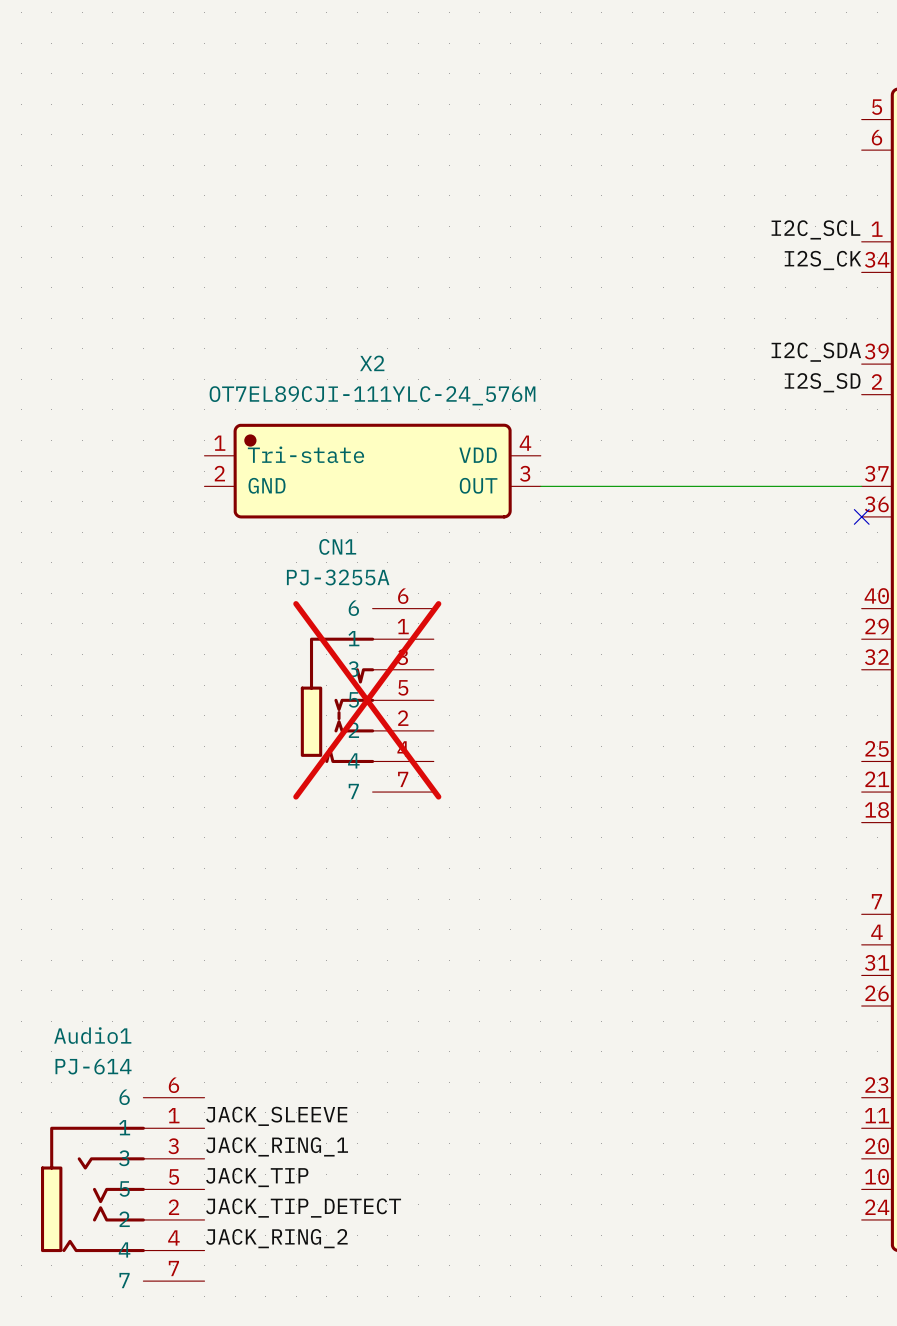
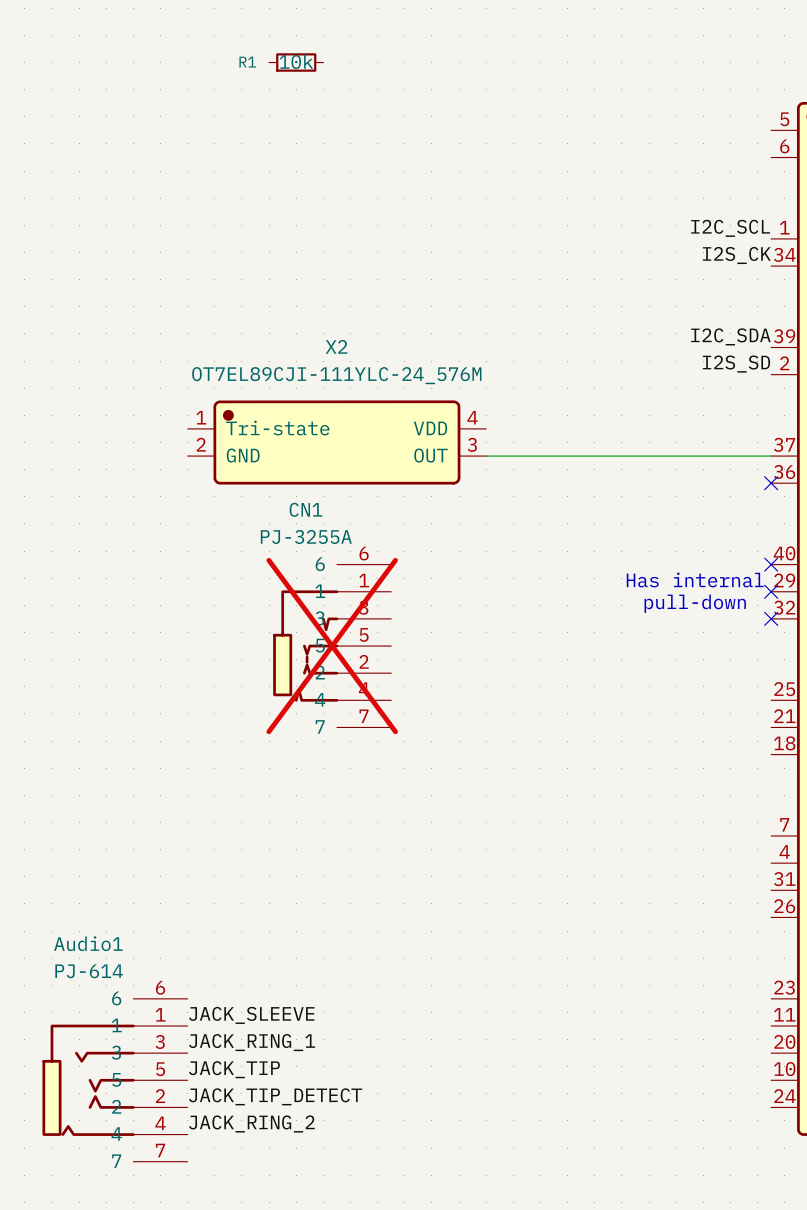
R1: none -> 10k (296, 62)
no-connect mark: none -> (771, 564)
text: none -> Has internal (695, 580)
no-connect mark: none -> (771, 591)
text: none -> pull-down (695, 603)
no-connect mark: none -> (771, 618)

